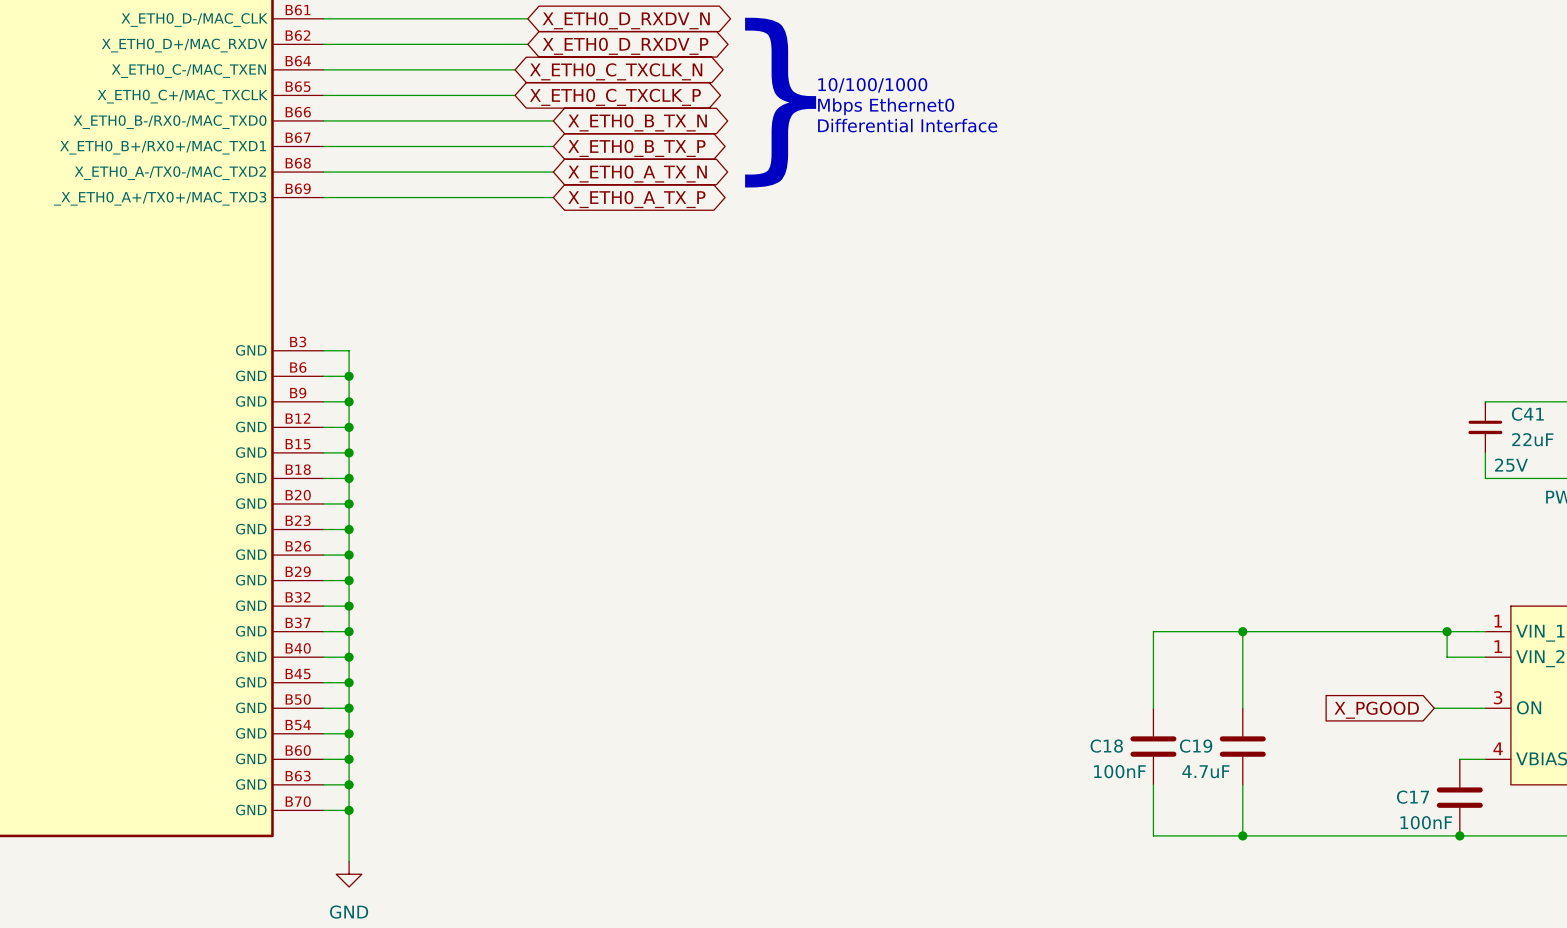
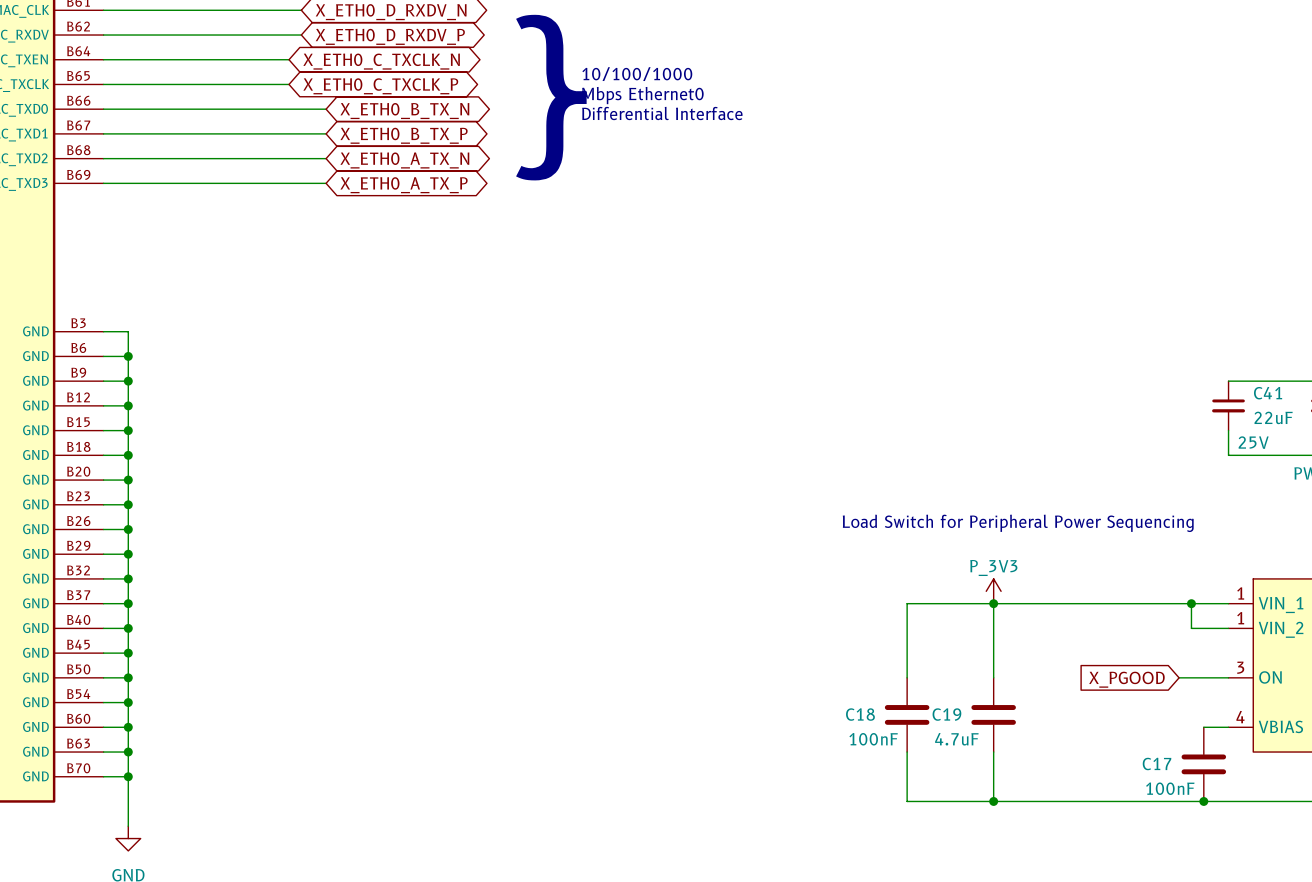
text: none -> Load Switch for Peripheral Power Sequencing (1018, 523)
power symbol: none -> P_3V3 (993, 591)

